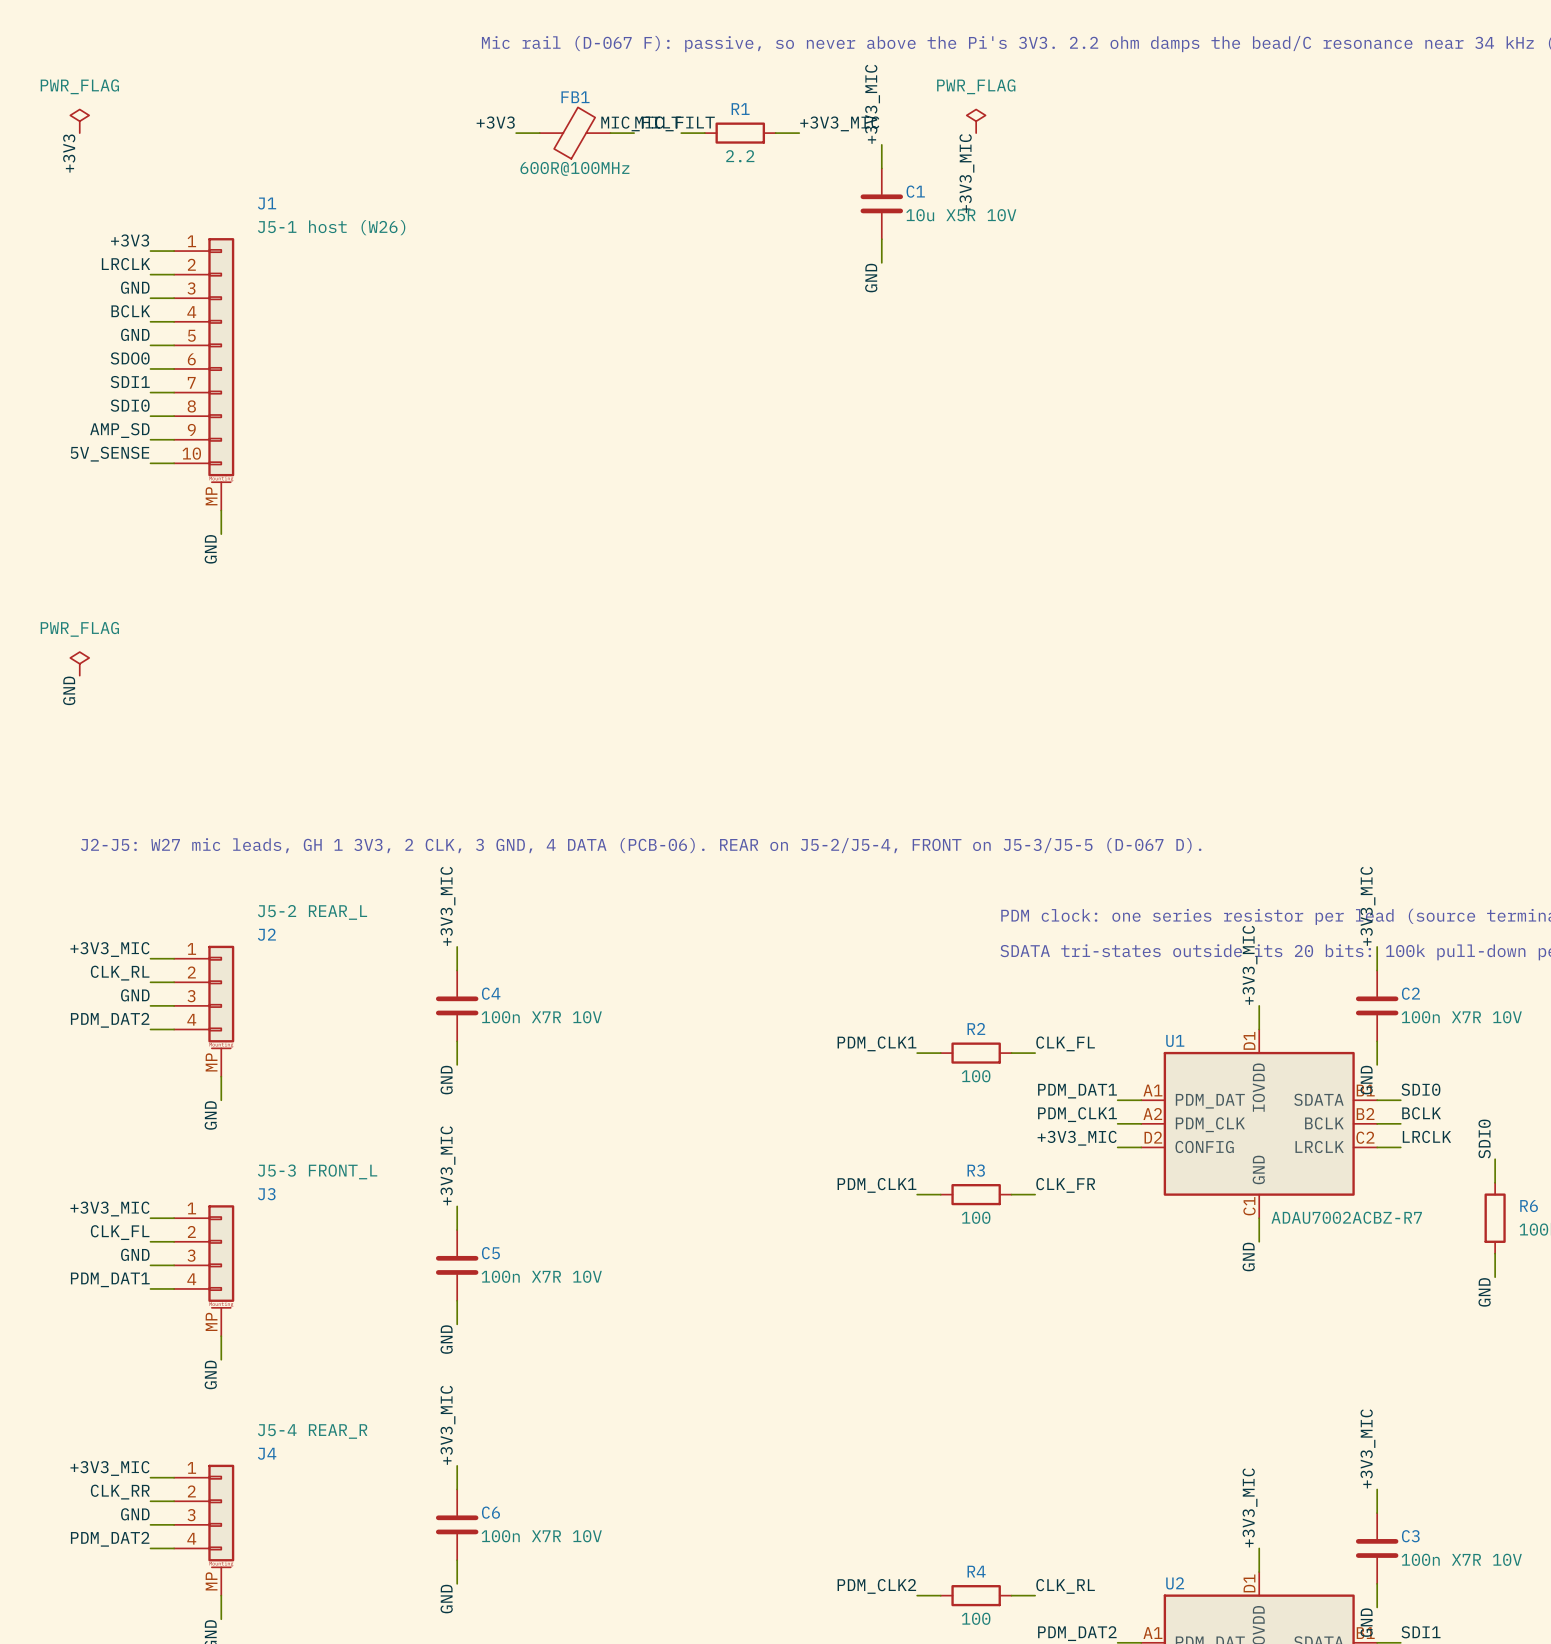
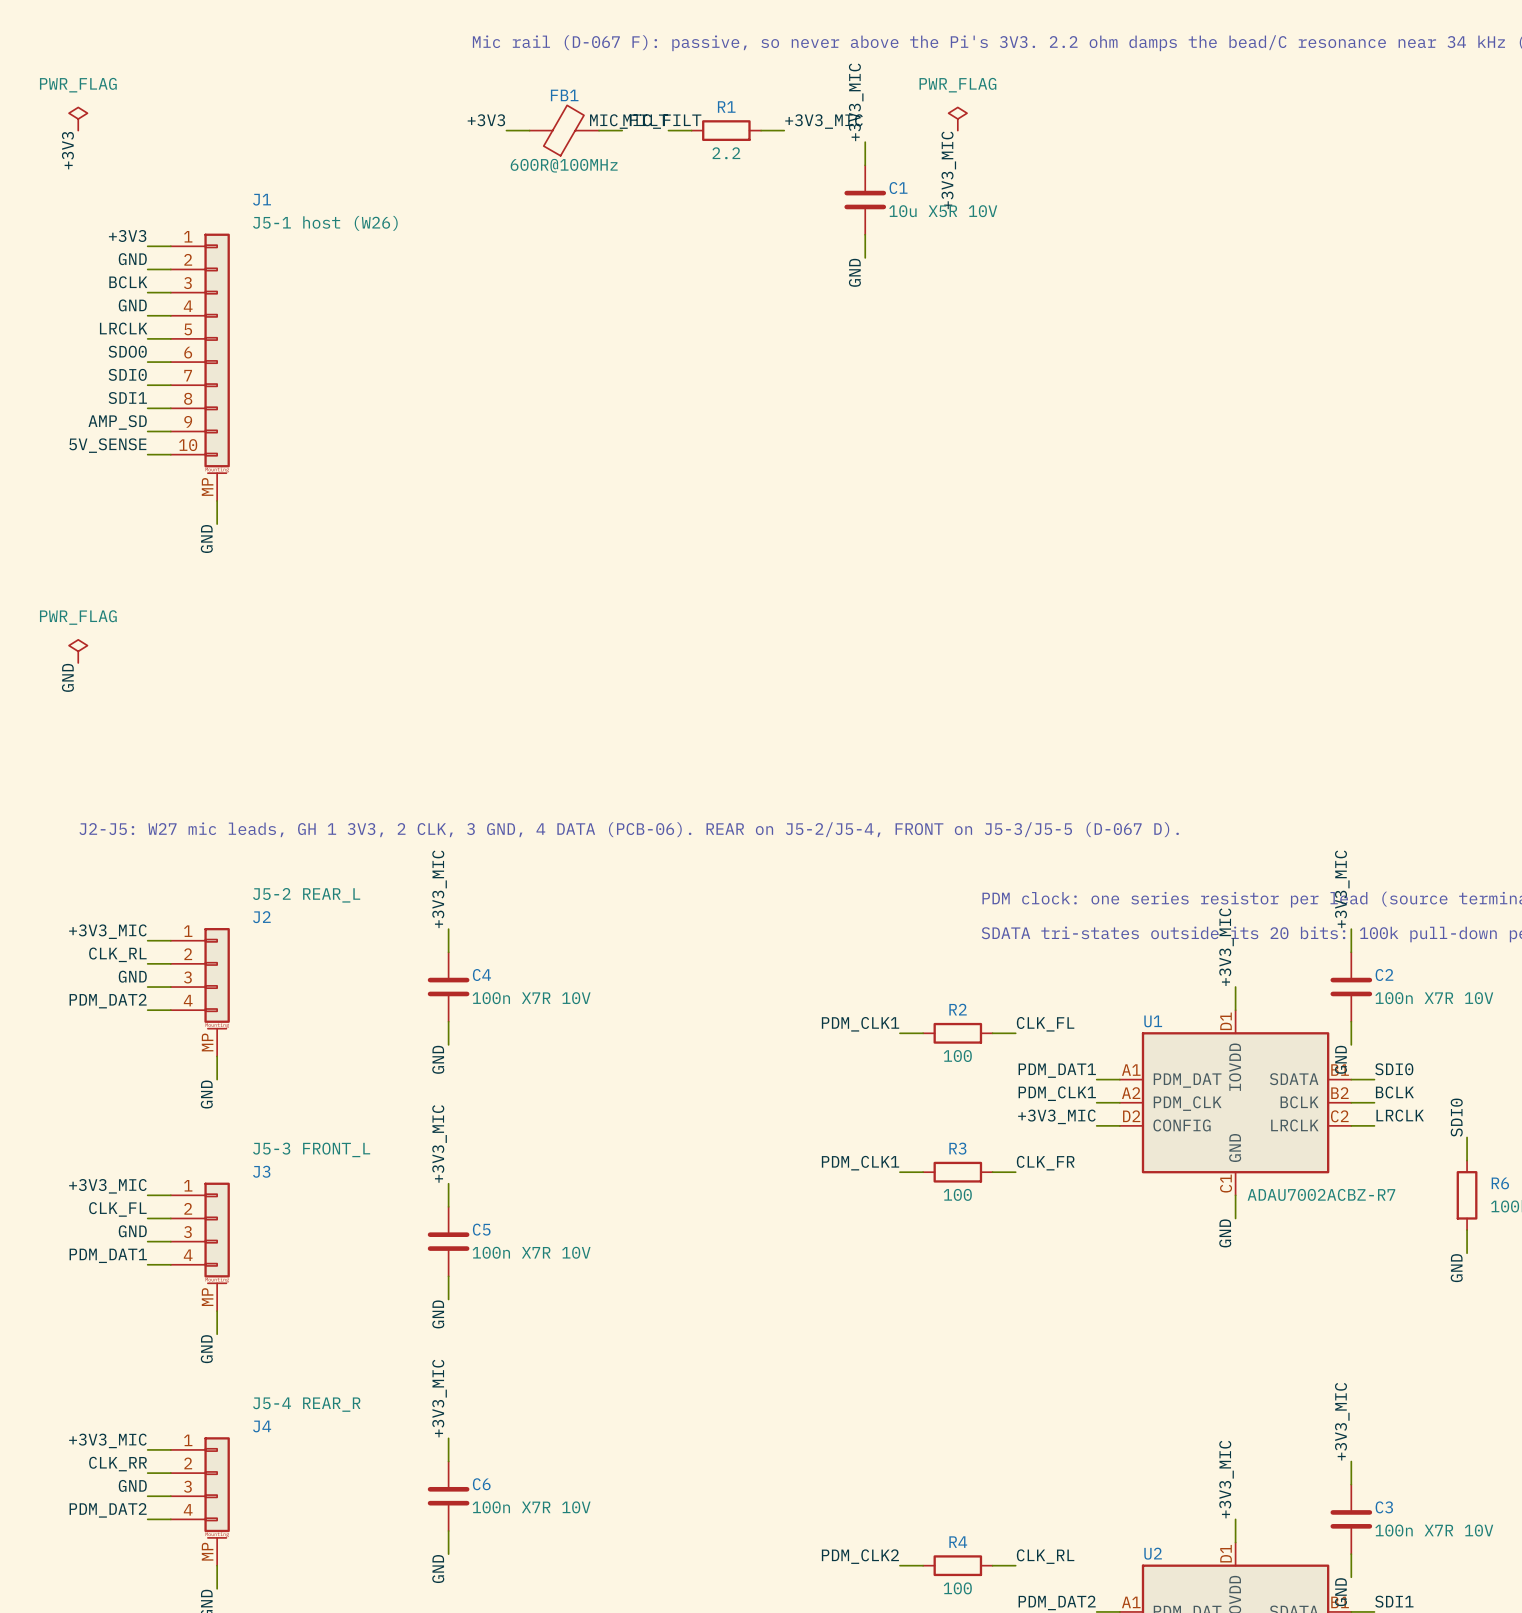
label: LRCLK (126, 264) -> GND (132, 259)
label: GND (135, 287) -> BCLK (128, 282)
label: BCLK (130, 311) -> GND (132, 305)
label: GND (135, 334) -> LRCLK (123, 328)
label: SDI1 (130, 382) -> SDI0 (127, 374)
label: SDI0 (130, 405) -> SDI1 (127, 398)

